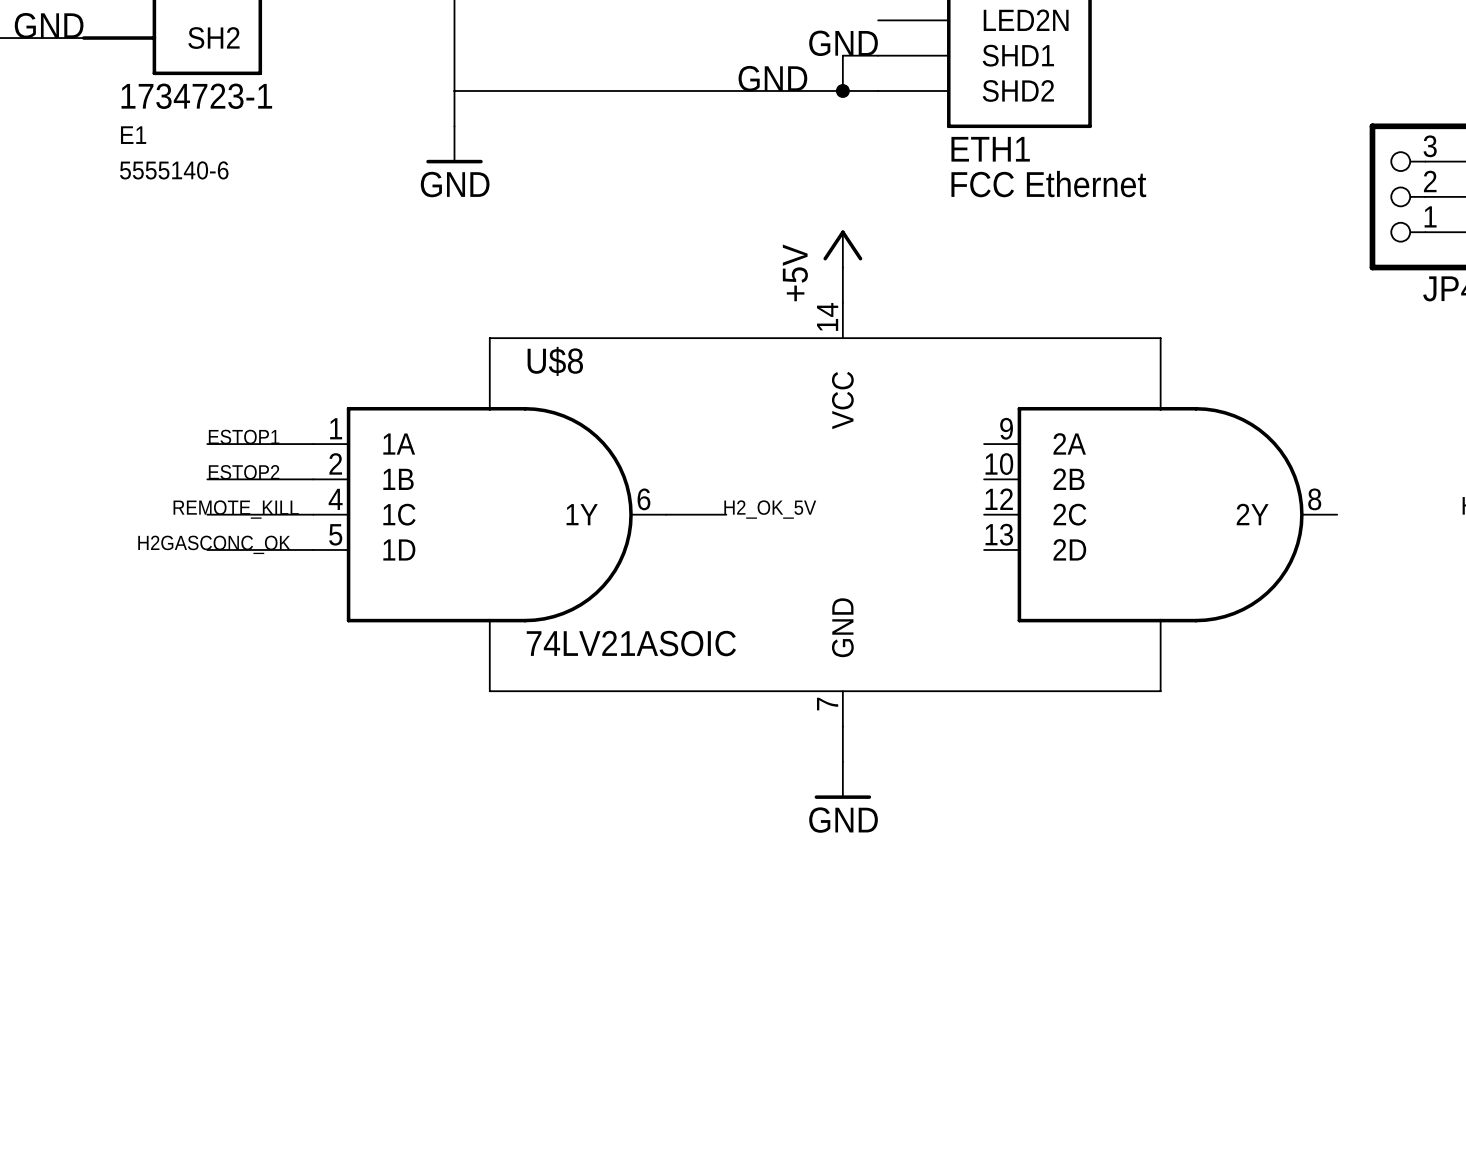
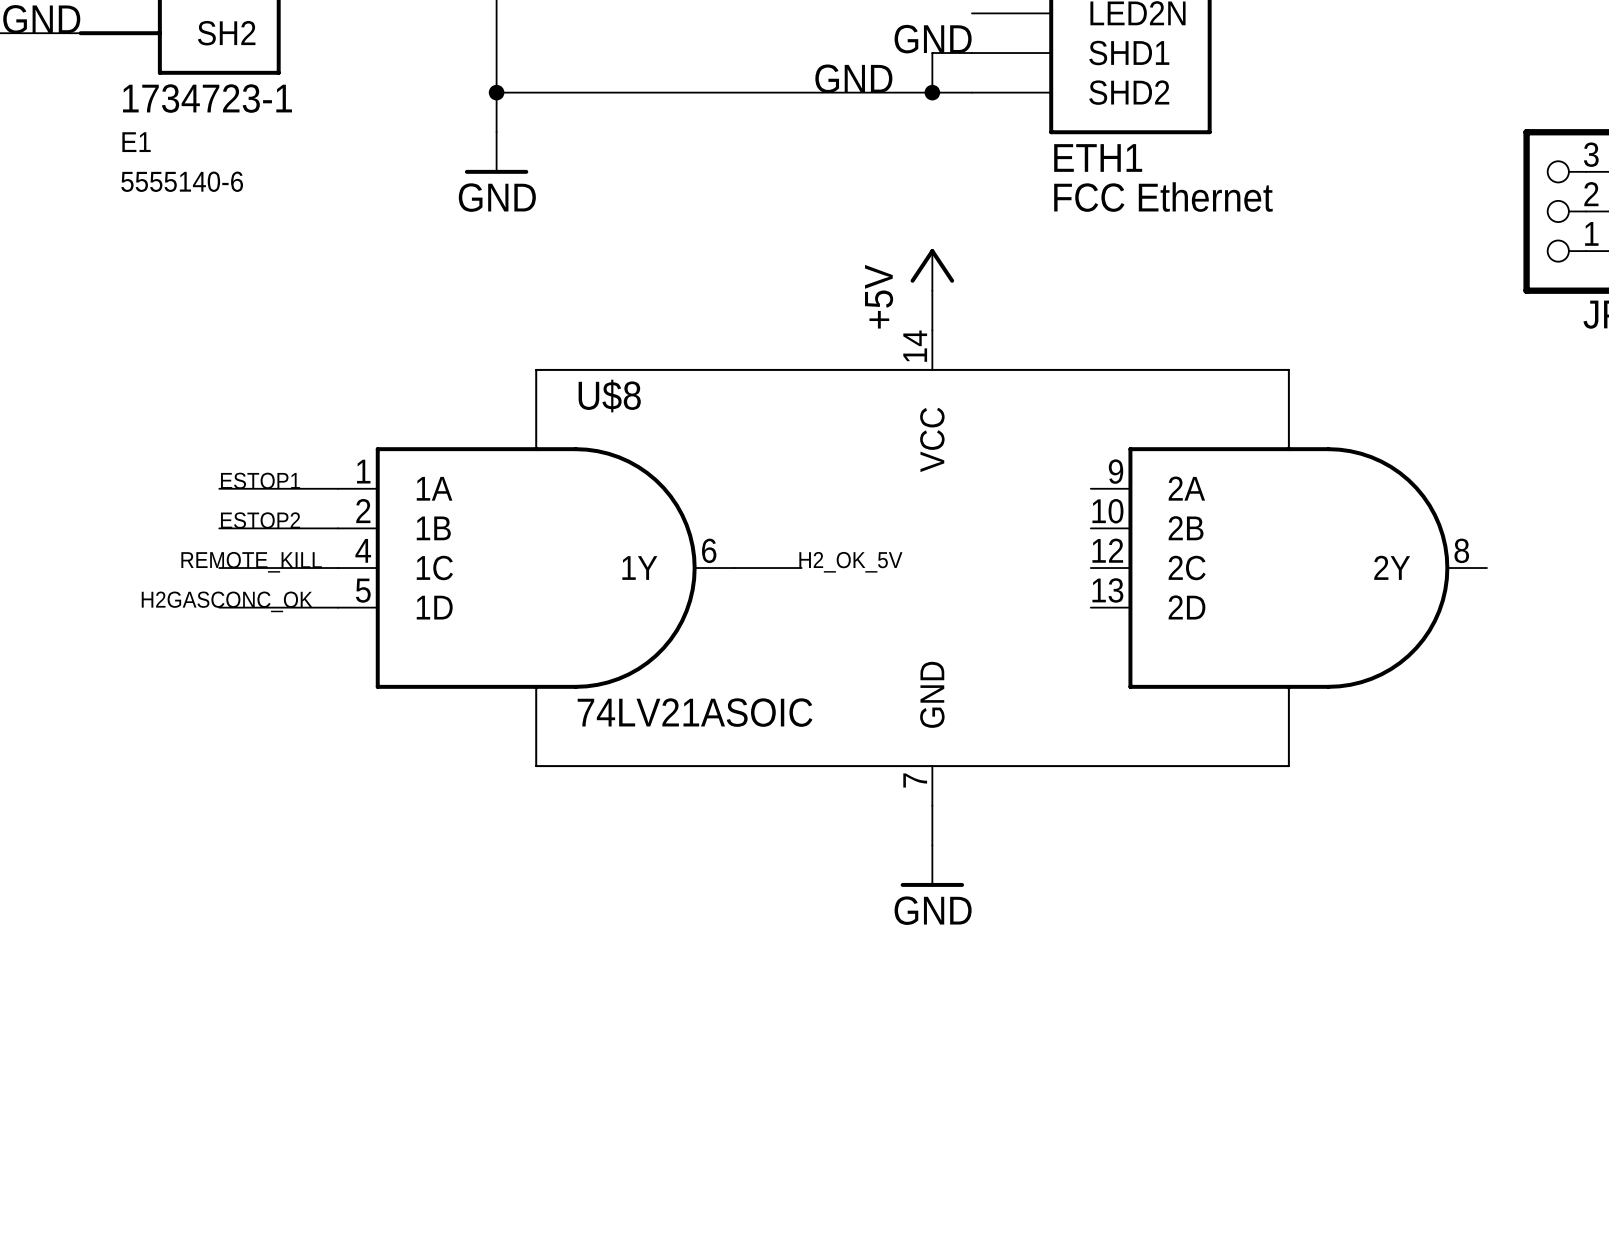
junction: none -> (496, 92)

